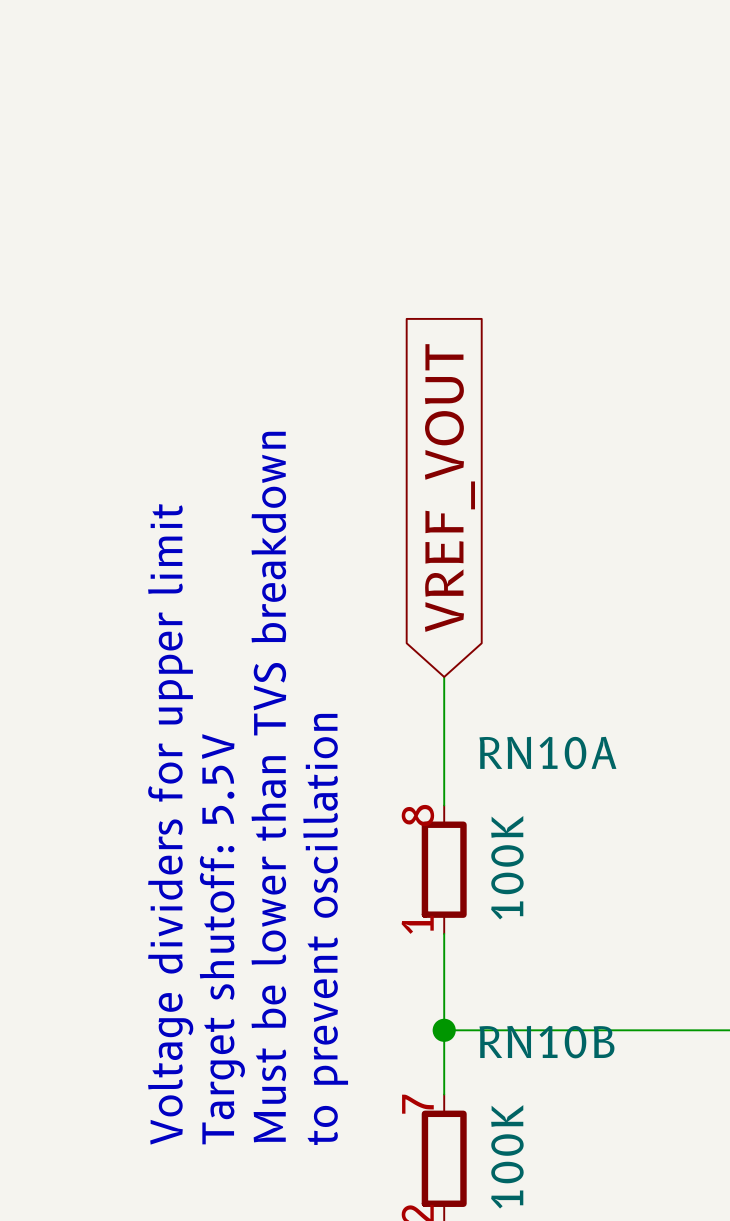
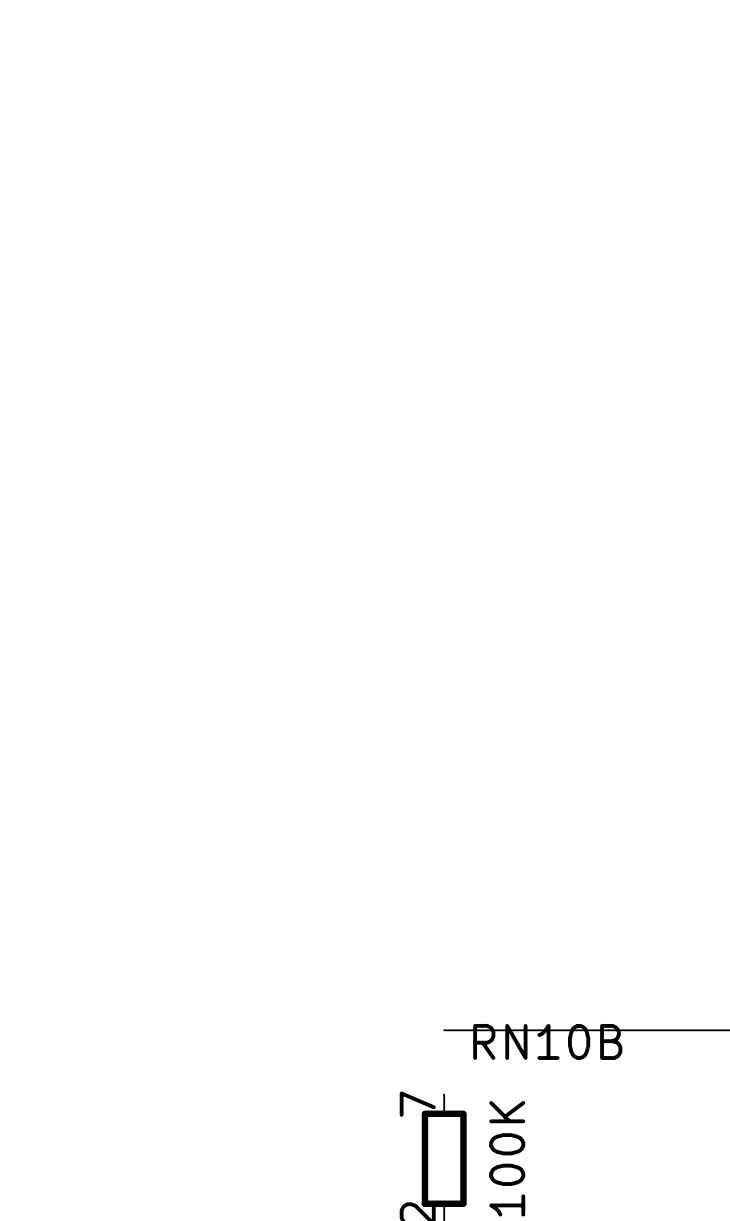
global label: VREF_VOUT (449, 488) -> none
wire: (444, 676) (444, 805) -> none
text: Must be lower than TVS breakdown (268, 787) -> none
text: Voltage dividers for upper limit (170, 824) -> none
RN10A: 100K (444, 869) -> none
text: to prevent oscillation (325, 929) -> none
wire: (444, 933) (444, 1094) -> none
text: Target shutoff: 5.5V (222, 939) -> none
junction: (444, 1030) -> none

